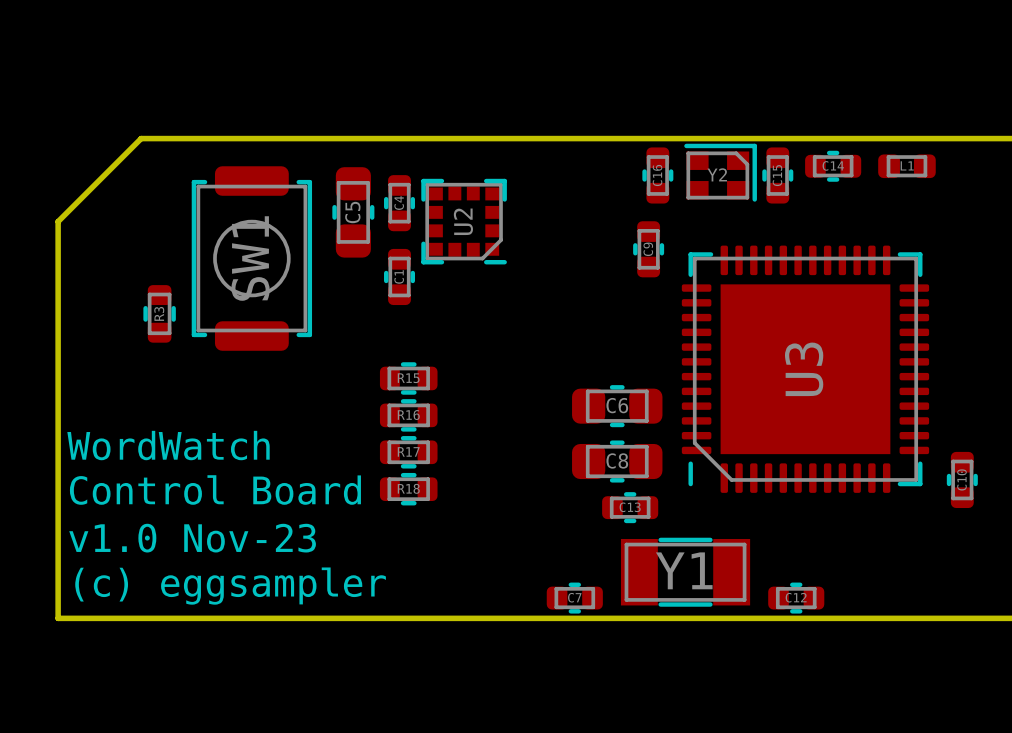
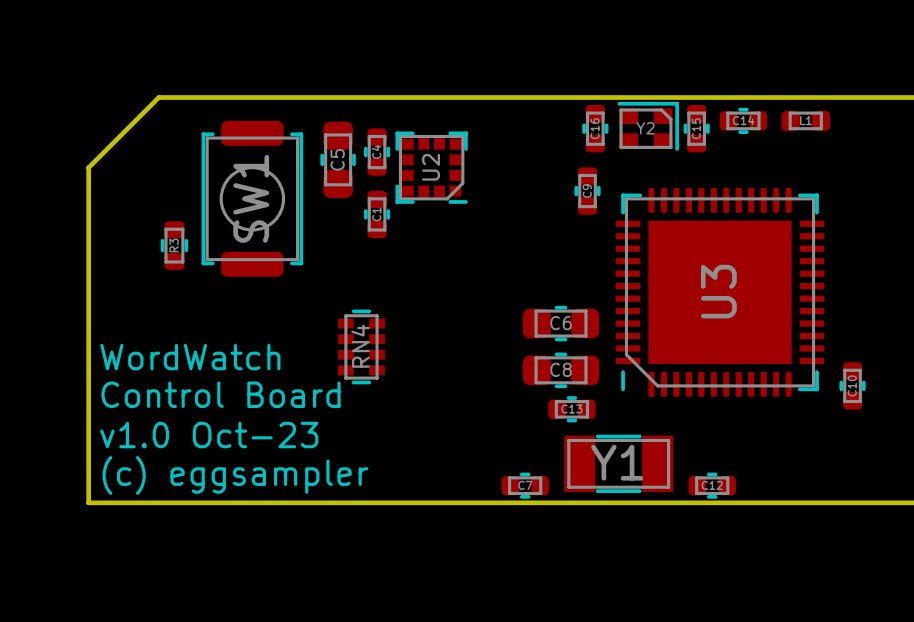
R15: (408, 378) -> none
R16: (408, 415) -> none
RN4: none -> (361, 346)
R17: (408, 452) -> none
R18: (408, 489) -> none
text: v1.0 Nov-23 (192, 538) -> v1.0 Oct-23 (209, 435)

